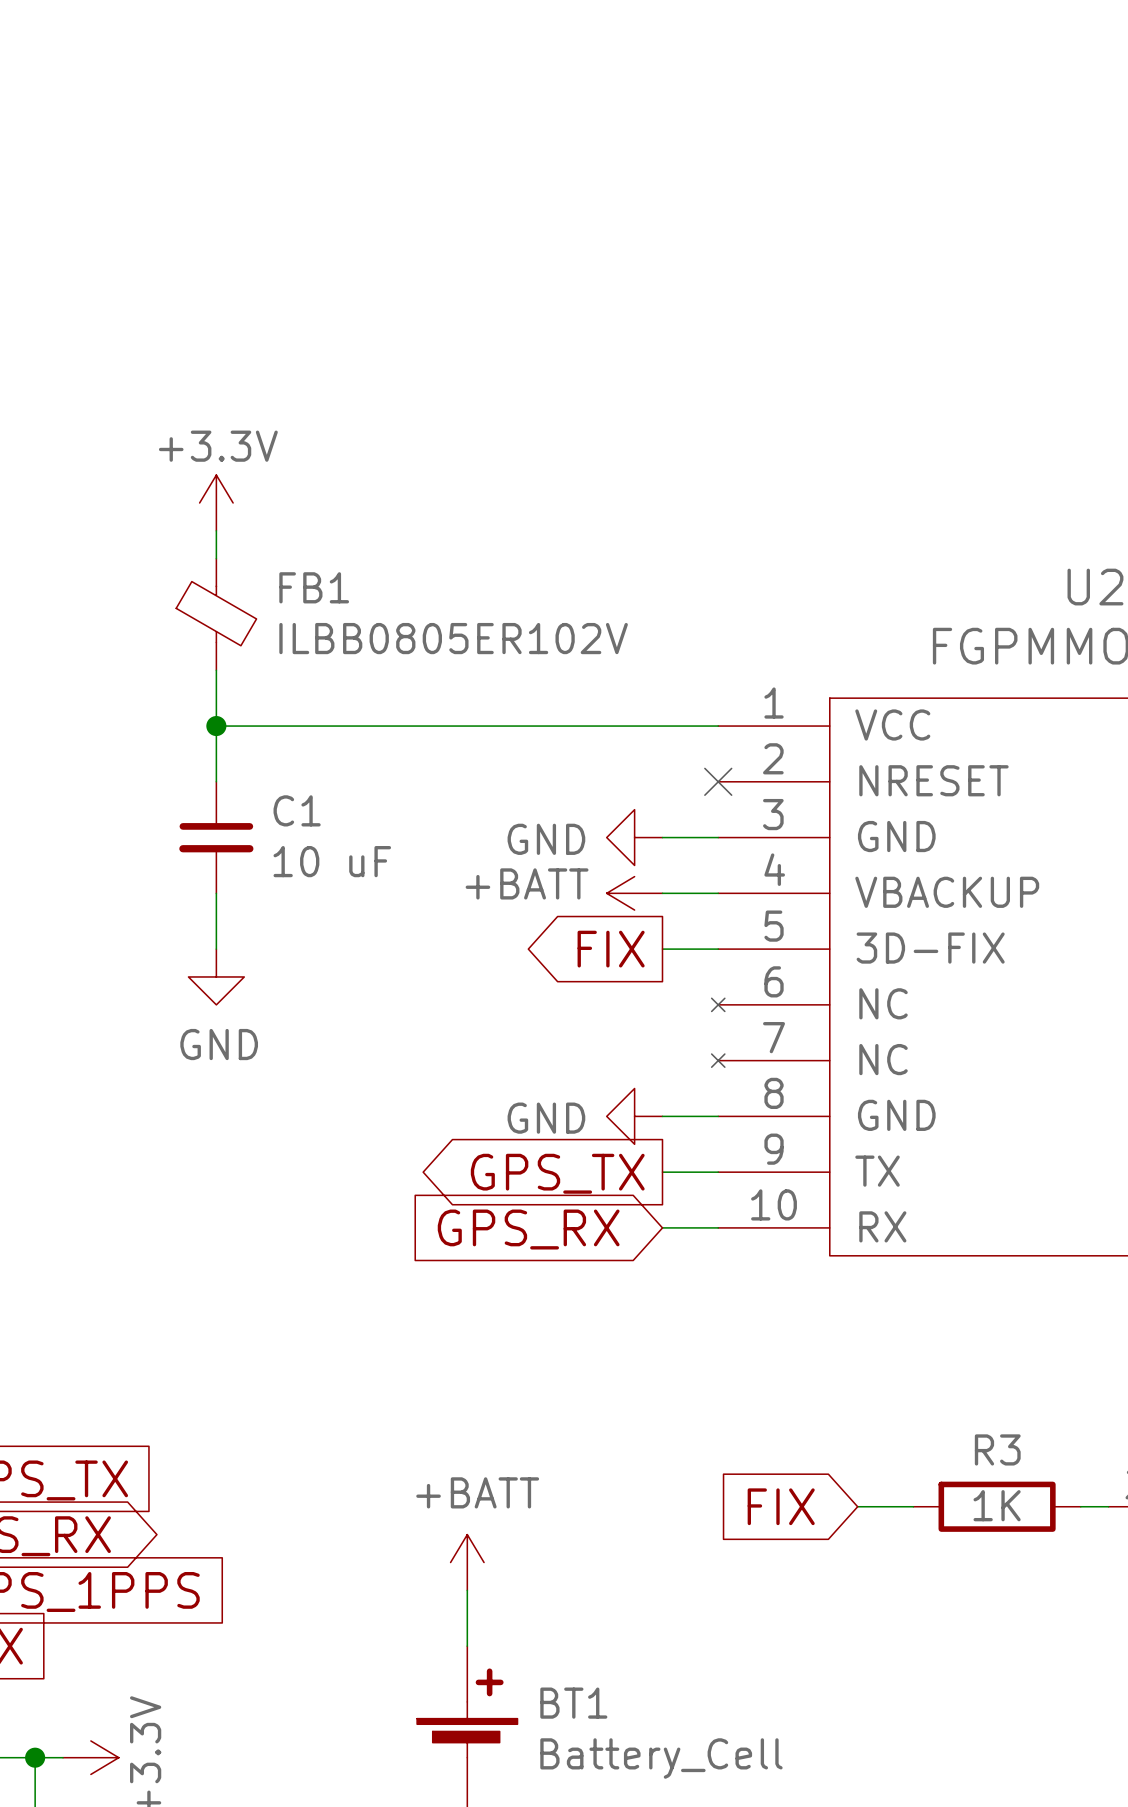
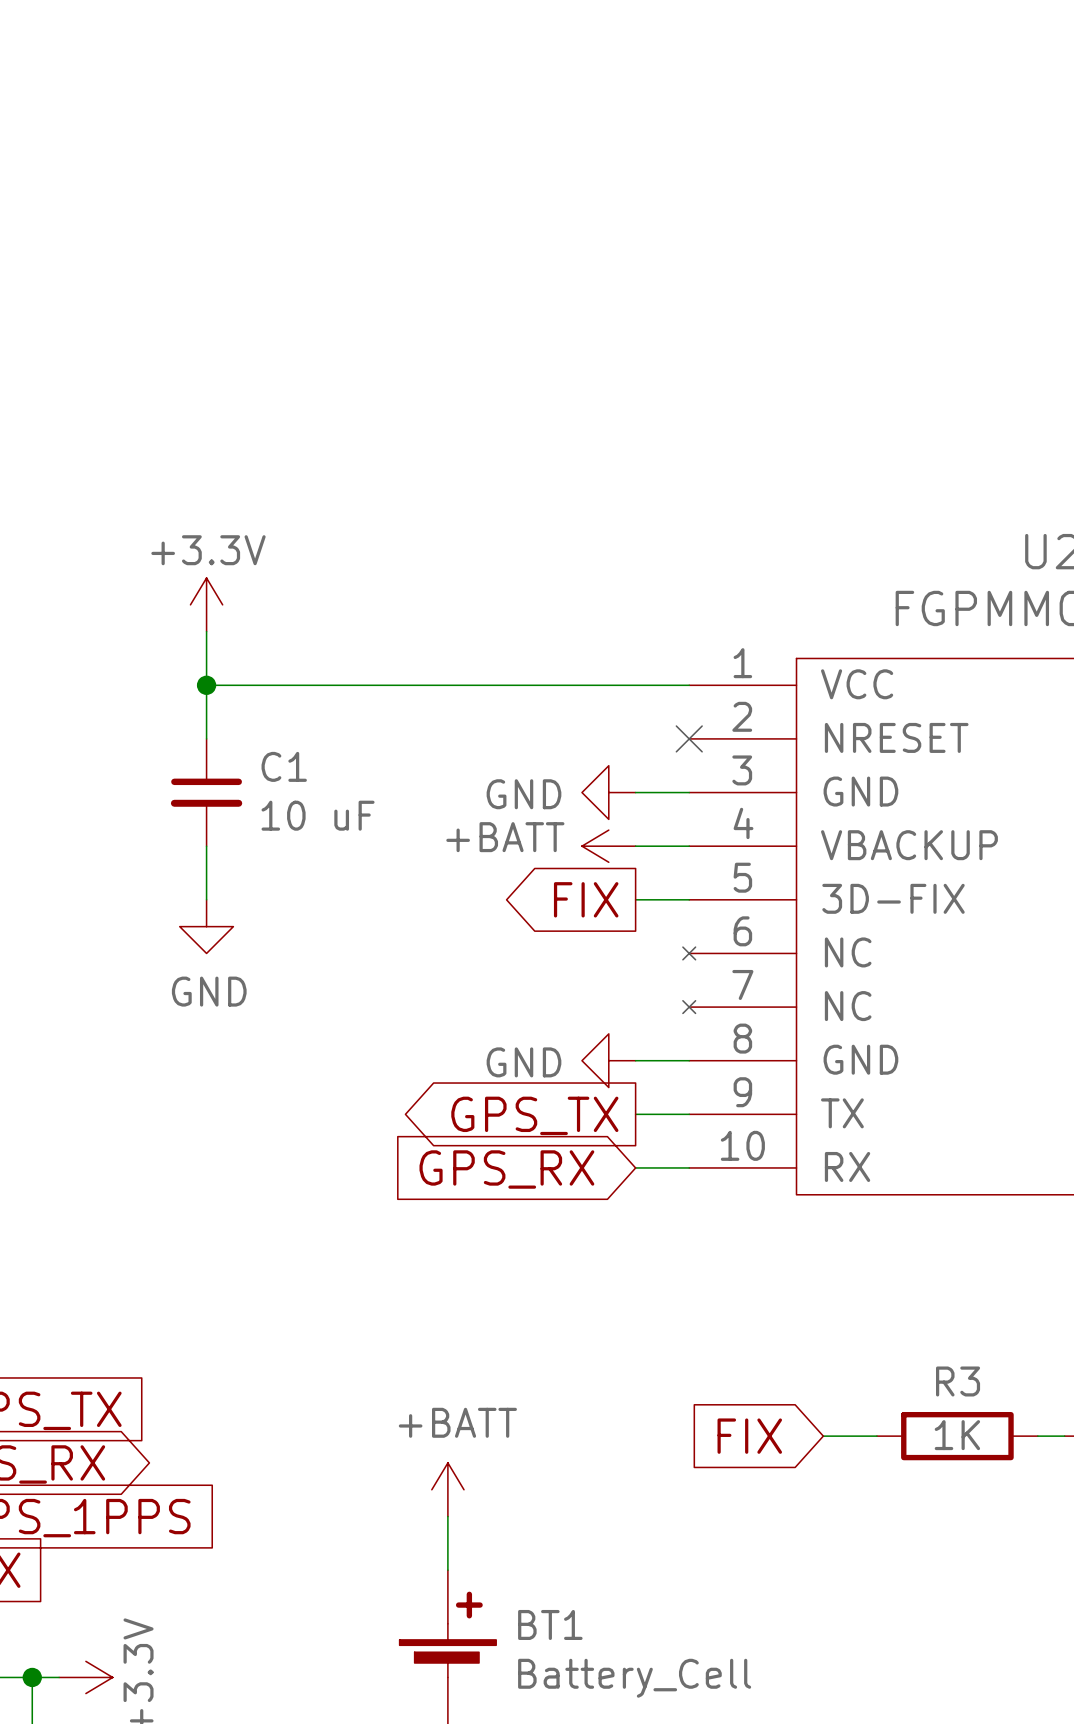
power symbol position: +3.3V (216, 502) -> +3.3V (206, 604)
wire: (216, 530) (216, 558) -> none
FB1: ILBB0805ER102V (216, 614) -> none

